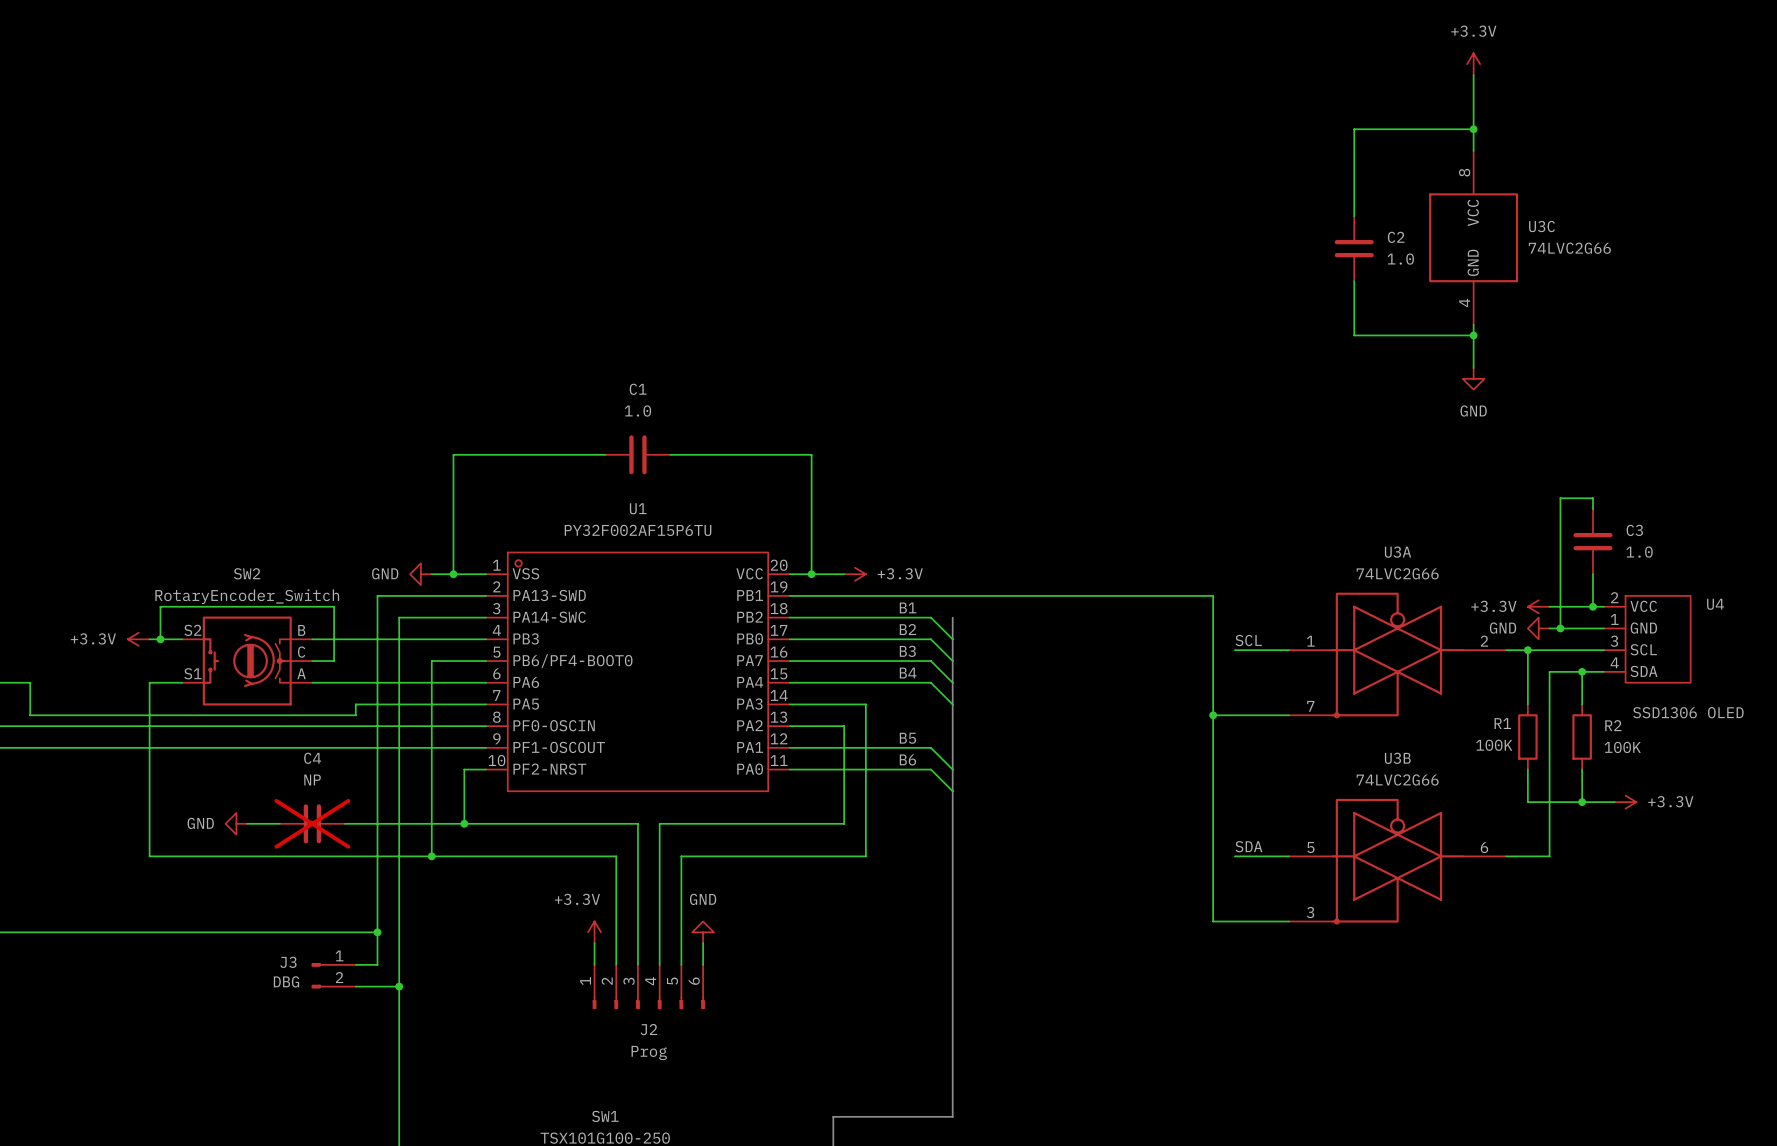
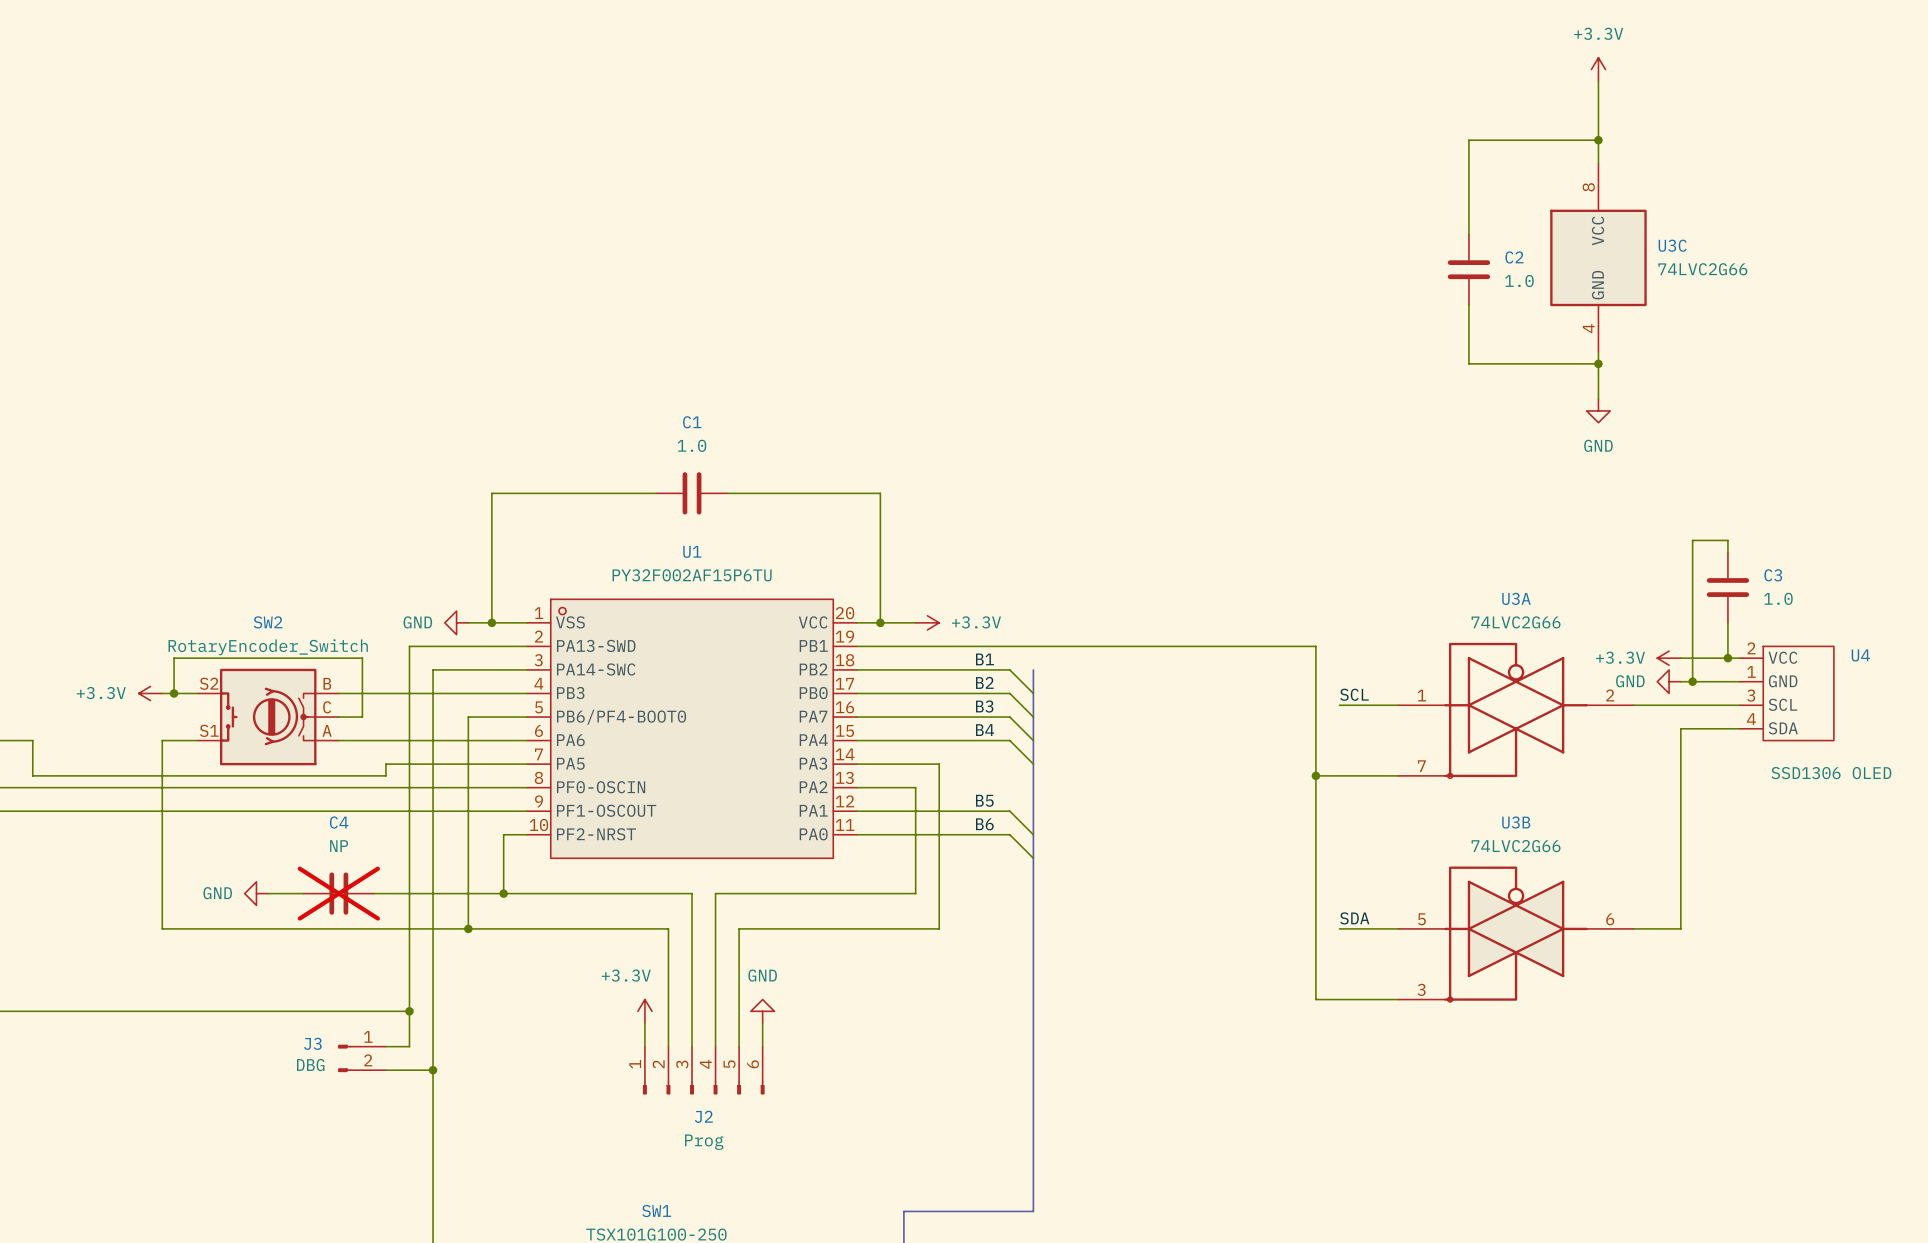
wire: (1527, 650) (1527, 704) -> none
junction: (1527, 650) -> none
wire: (1582, 671) (1582, 704) -> none
junction: (1582, 671) -> none
R1: 100K (1527, 736) -> none
R2: 100K (1582, 736) -> none
wire: (1527, 769) (1527, 802) (1614, 802) -> none
wire: (1582, 769) (1582, 802) -> none
junction: (1582, 802) -> none
power symbol: +3.3V (1625, 802) -> none

